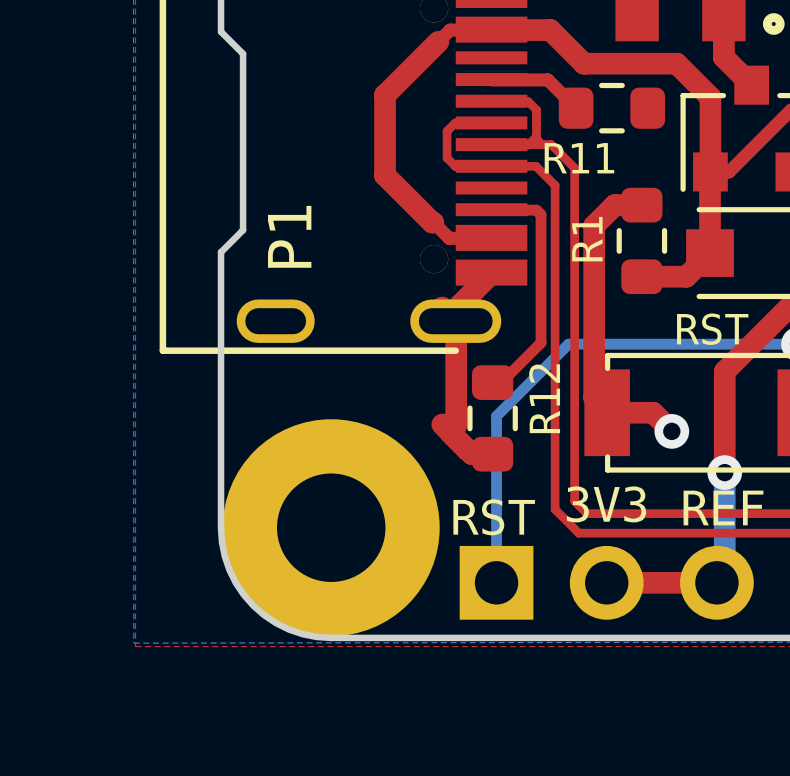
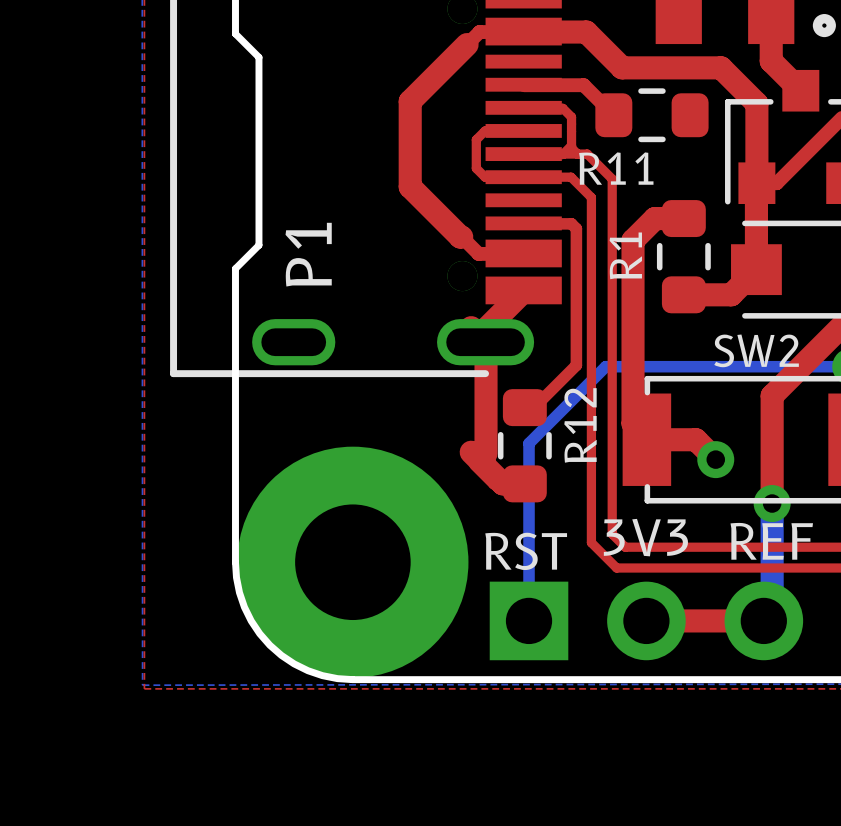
RST name: RST (712, 329) -> SW2 (756, 350)

